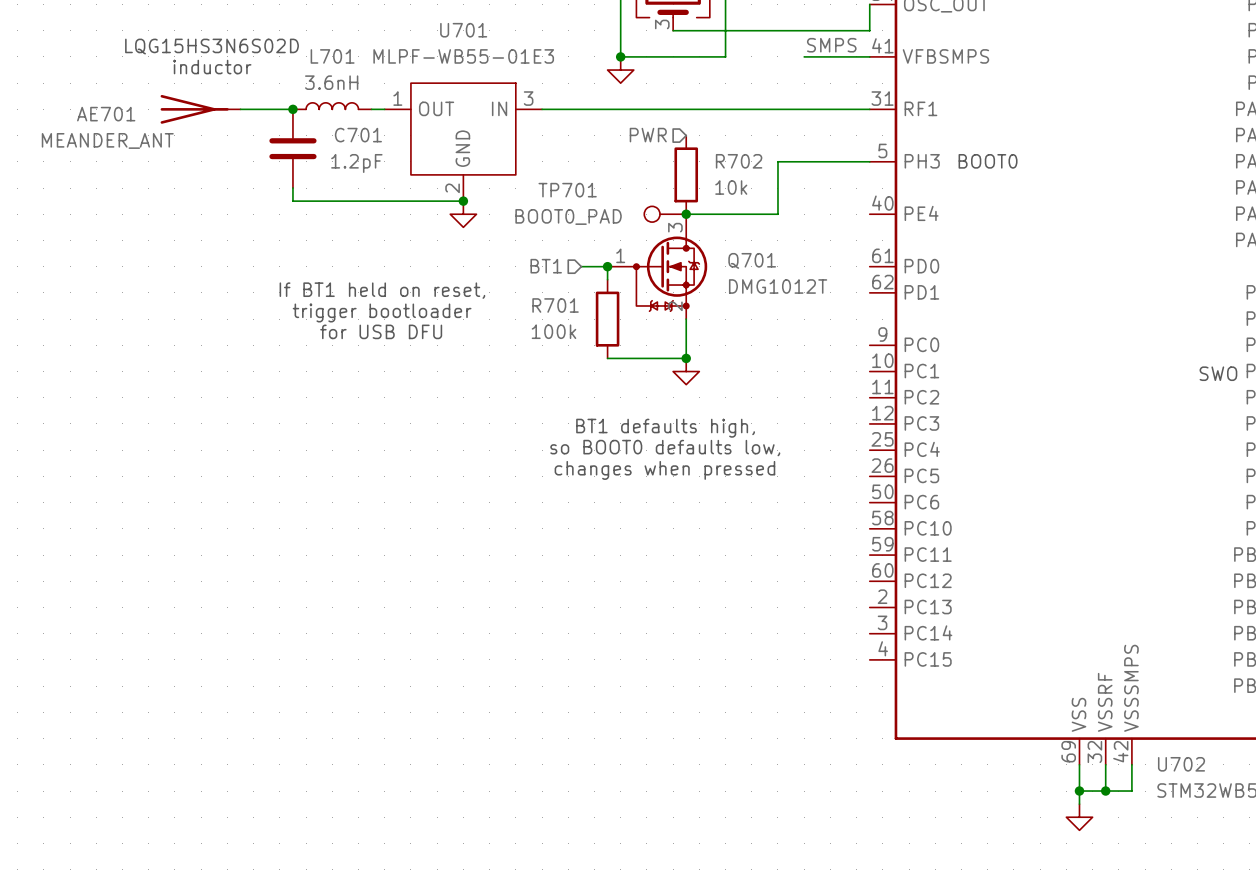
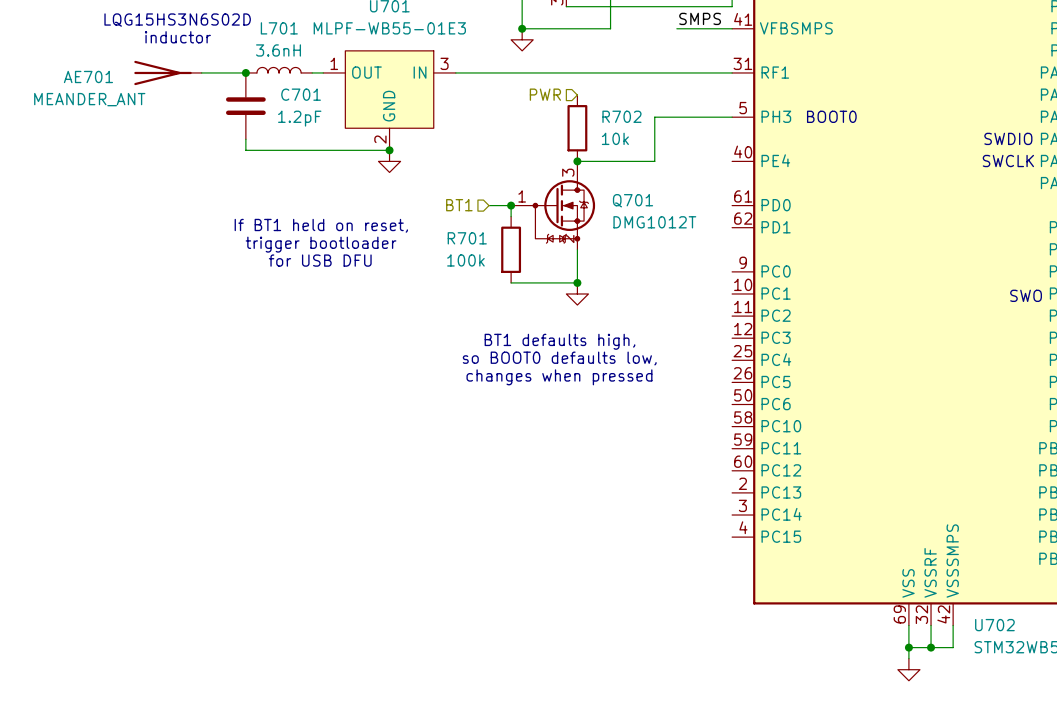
text: none -> SWDIO (1008, 138)
text: none -> SWCLK (1008, 161)
TP701: BOOT0_PAD (665, 214) -> none

